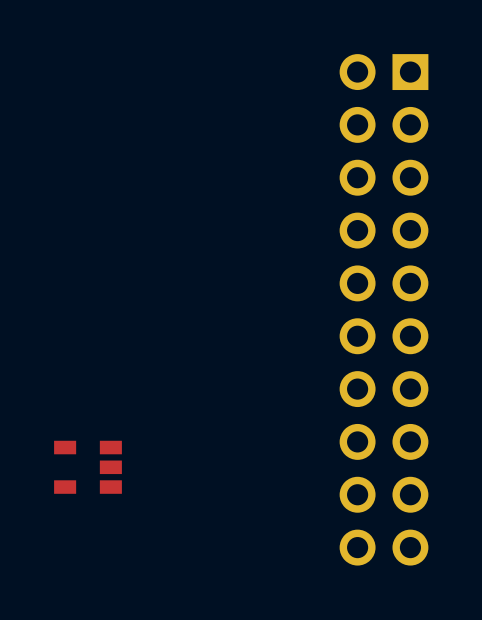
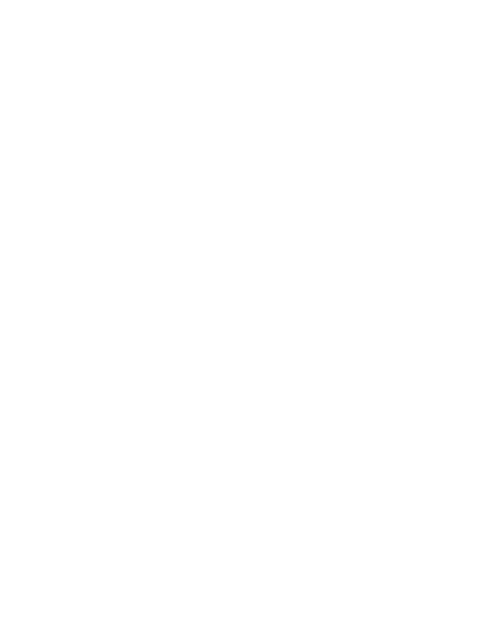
part: (384, 309) -> none
part: (88, 467) -> none

